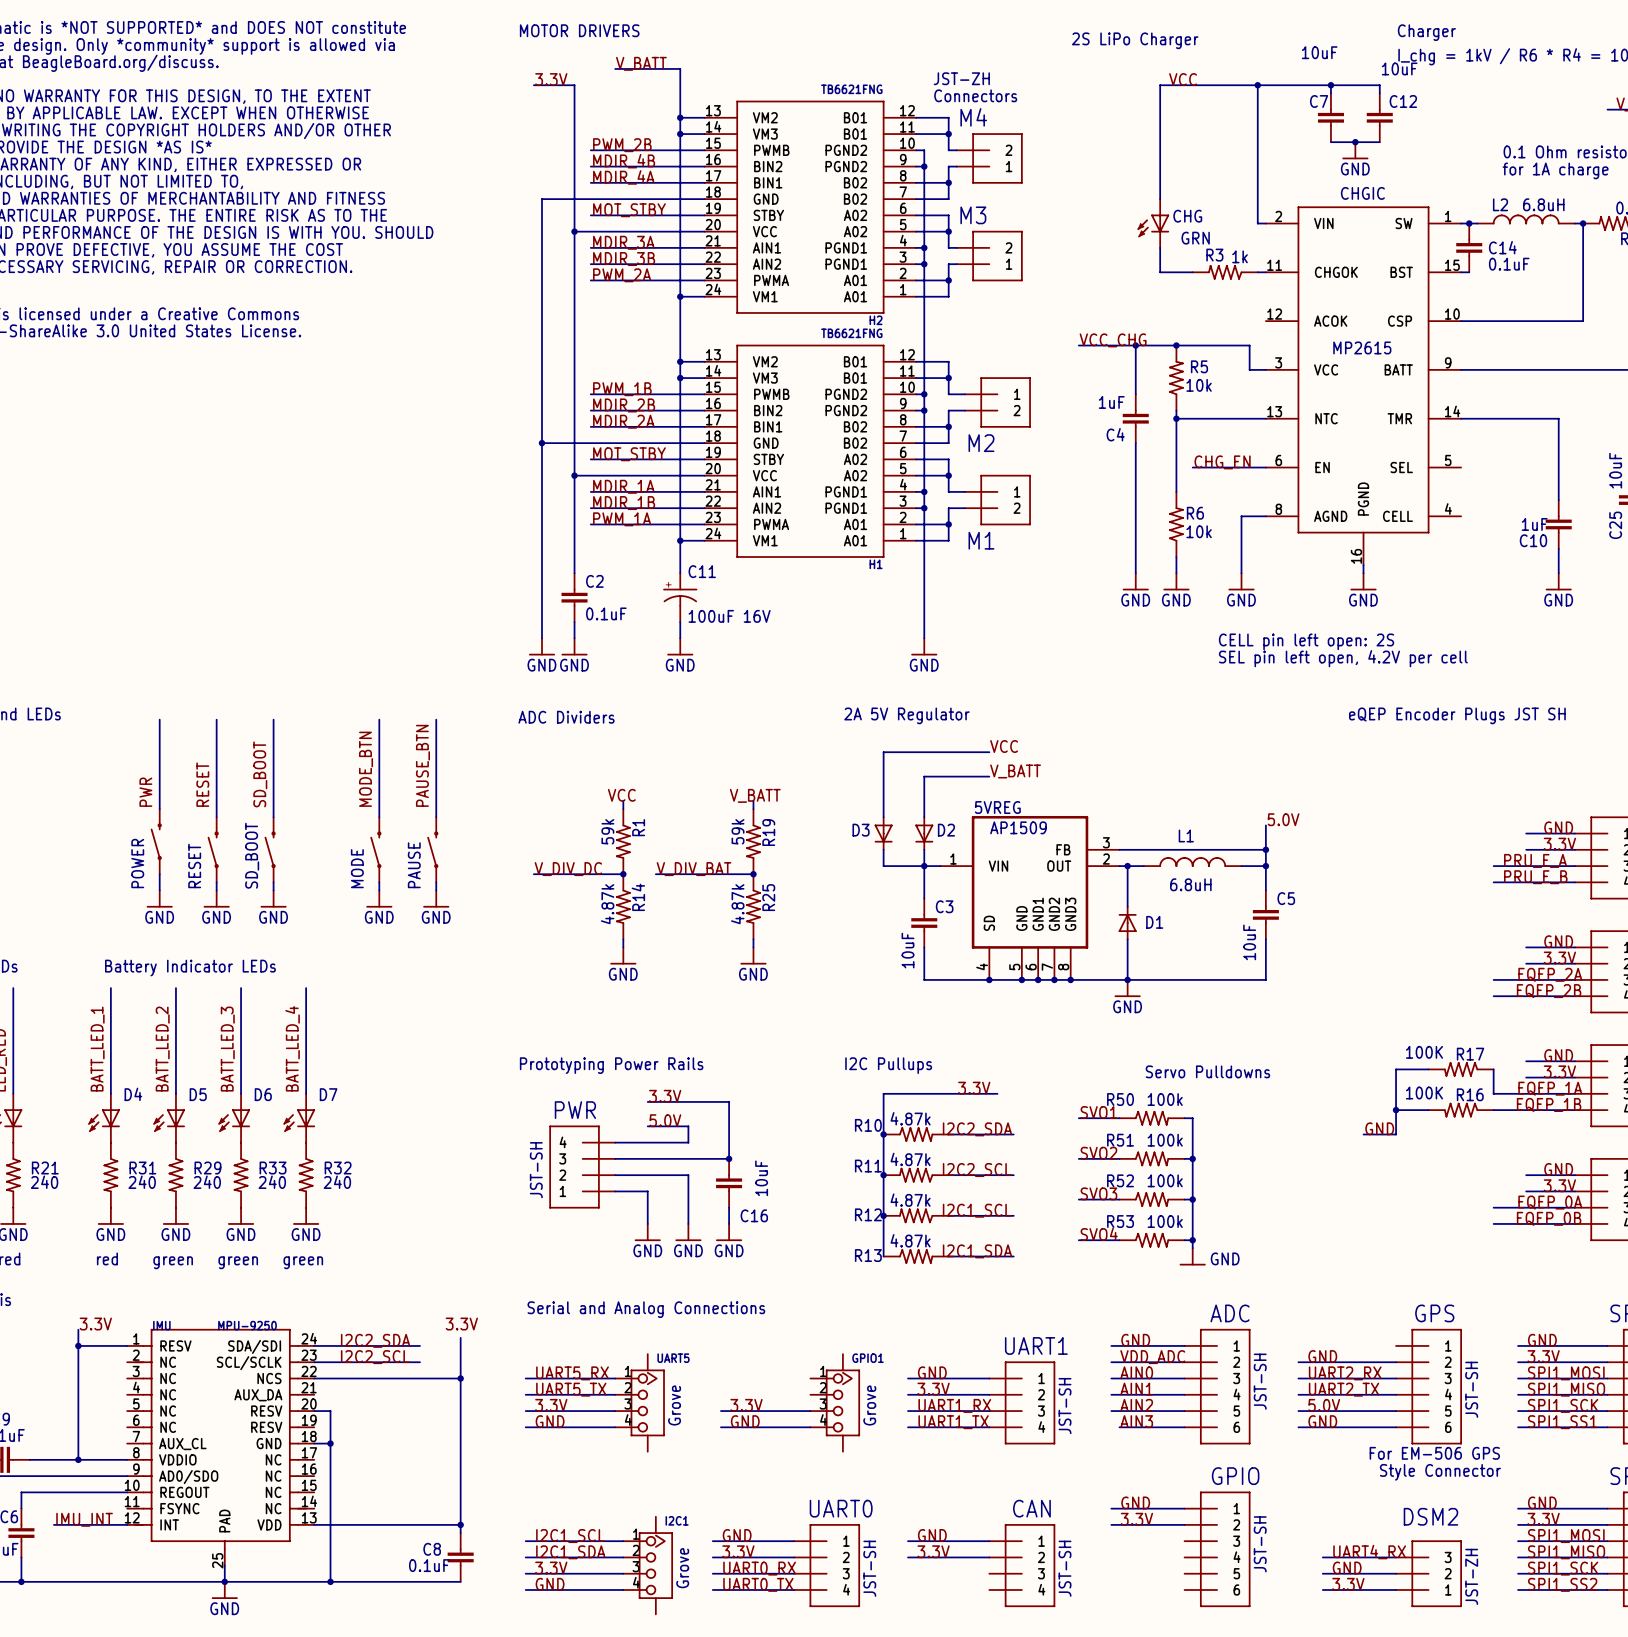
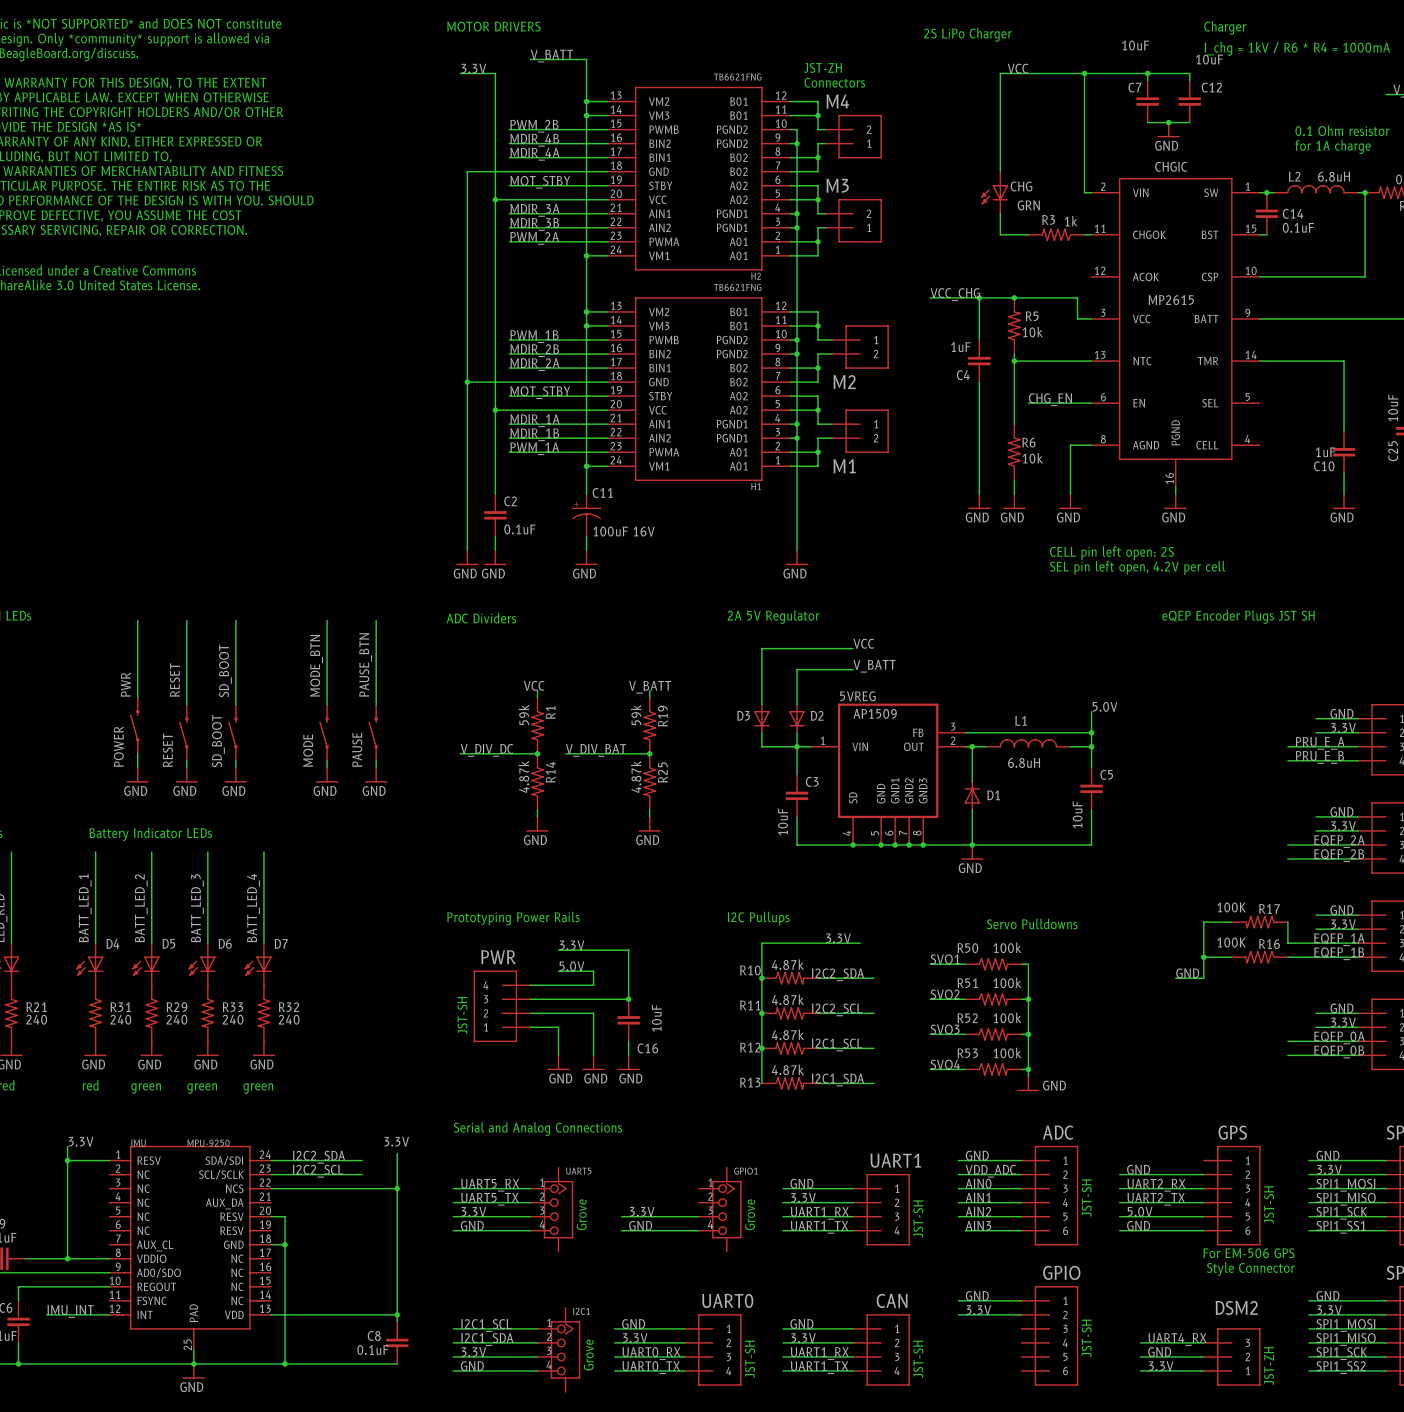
label: none -> UART1_RX (819, 1353)
wire: none -> (782, 1356) (853, 1356)
label: none -> UART1_TX (819, 1367)
wire: none -> (782, 1370) (853, 1370)

